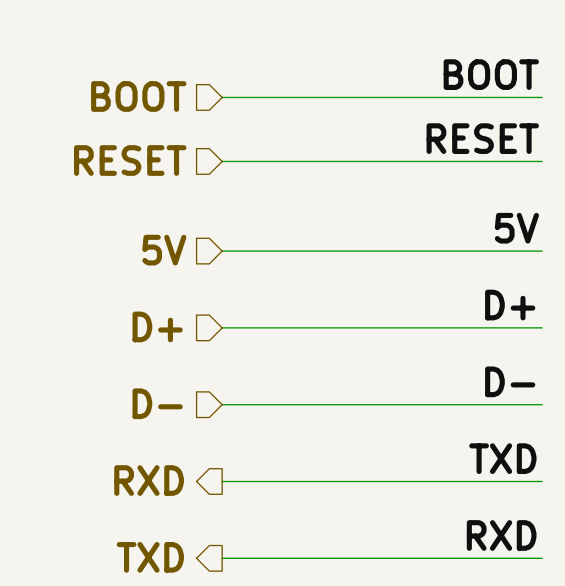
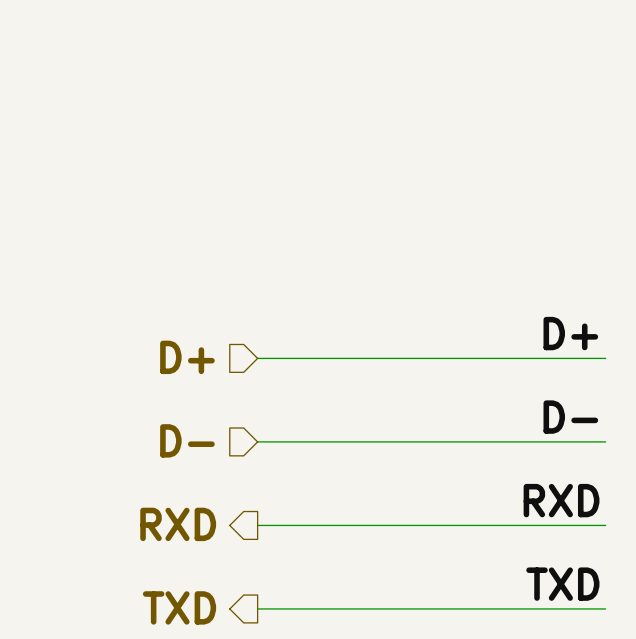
label: BOOT (491, 74) -> none
hierarchical label: BOOT (138, 96) -> none
wire: (222, 97) (542, 97) -> none
label: RESET (482, 138) -> none
hierarchical label: RESET (130, 160) -> none
wire: (222, 161) (542, 161) -> none
label: 5V (516, 228) -> none
hierarchical label: 5V (164, 250) -> none
wire: (222, 251) (542, 251) -> none
label: TXD (502, 458) -> RXD (561, 500)
label: RXD (501, 535) -> TXD (562, 584)

